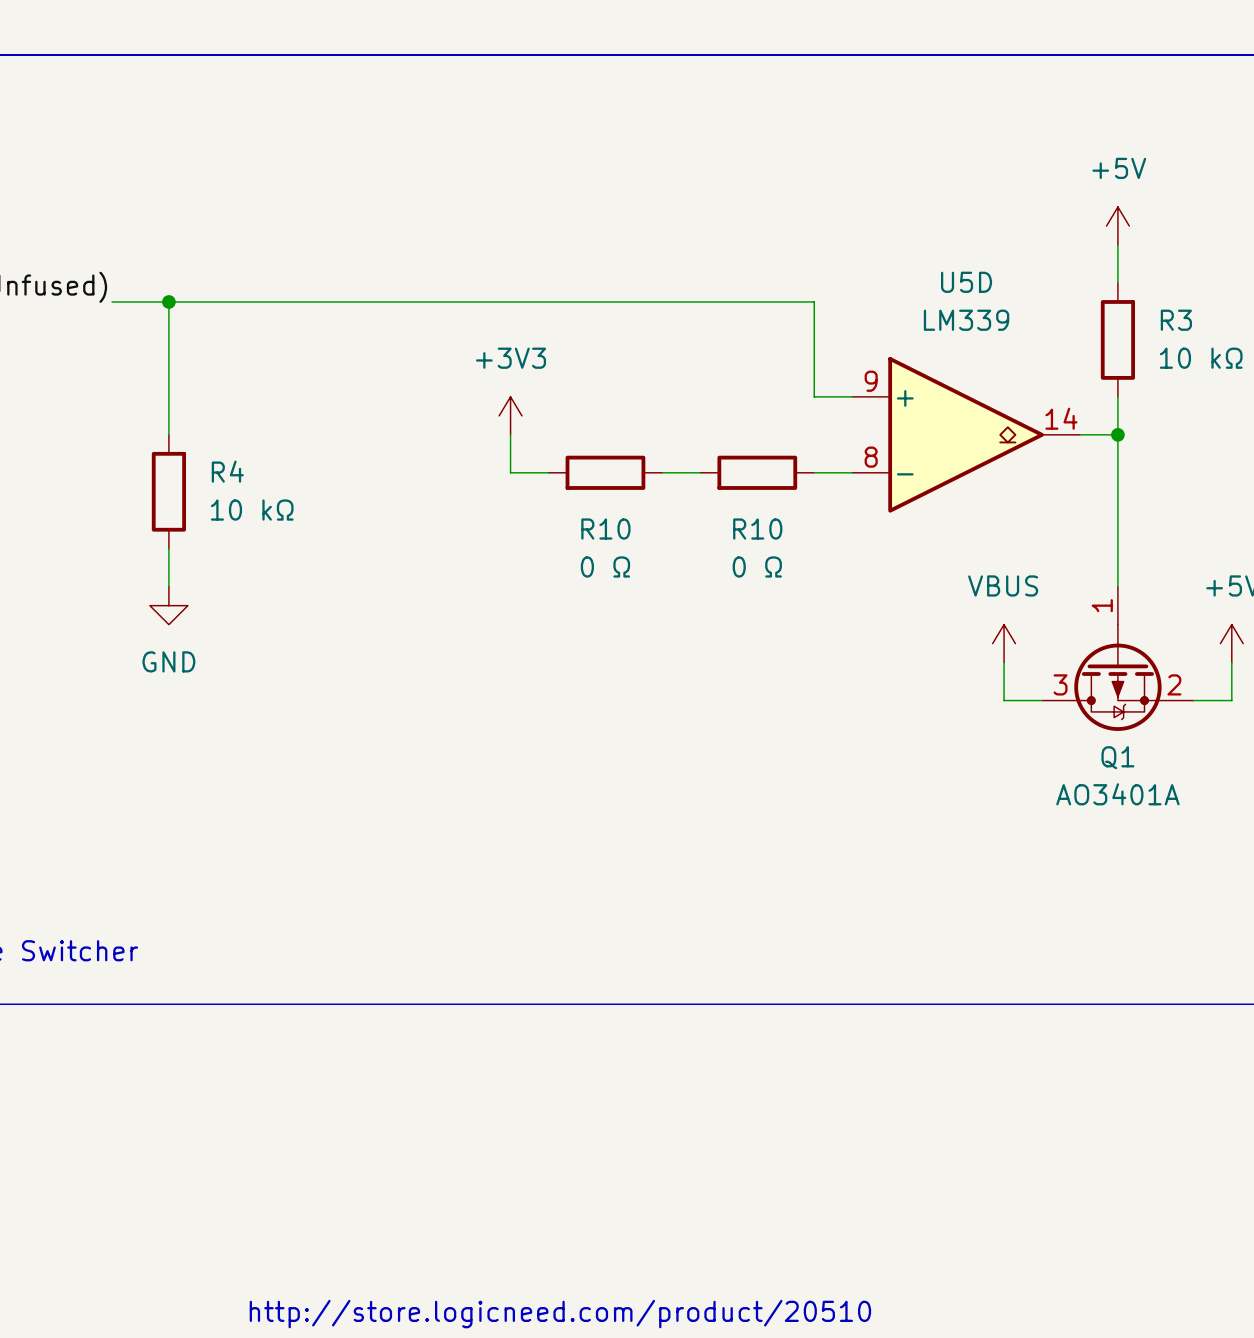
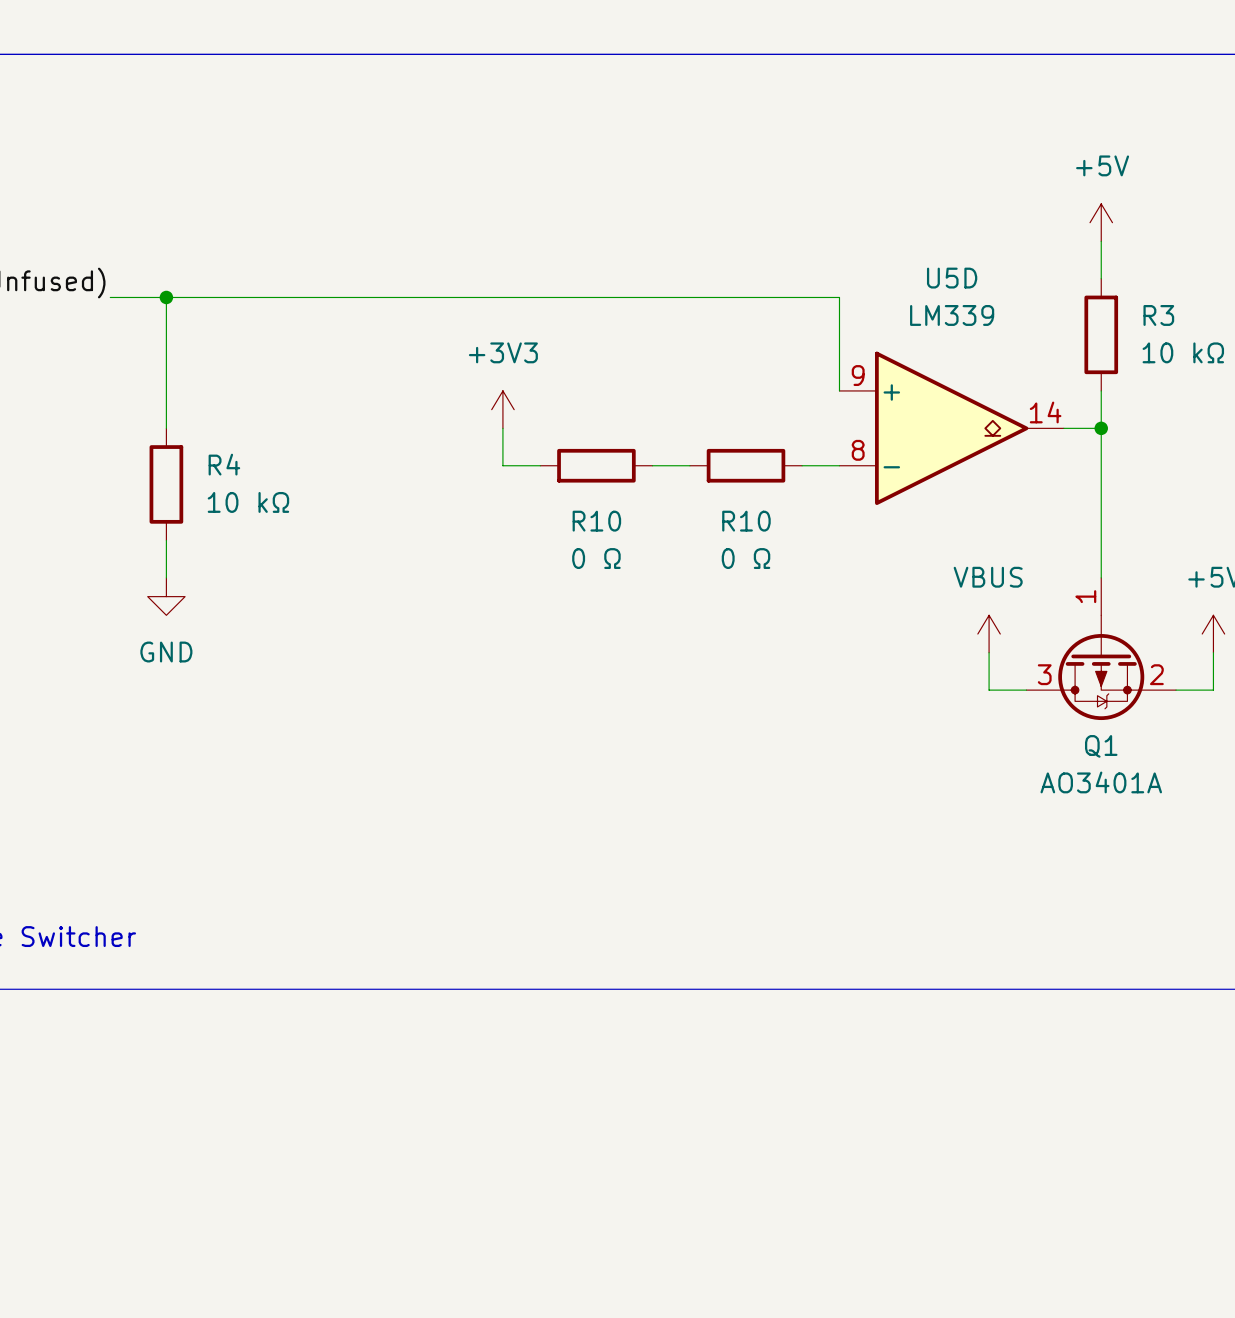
wire: (814, 301) (814, 396) (852, 396) -> (802, 297) (839, 297) (839, 390)
text: http://store.logicneed.com/product/20510 (560, 1314) -> none

